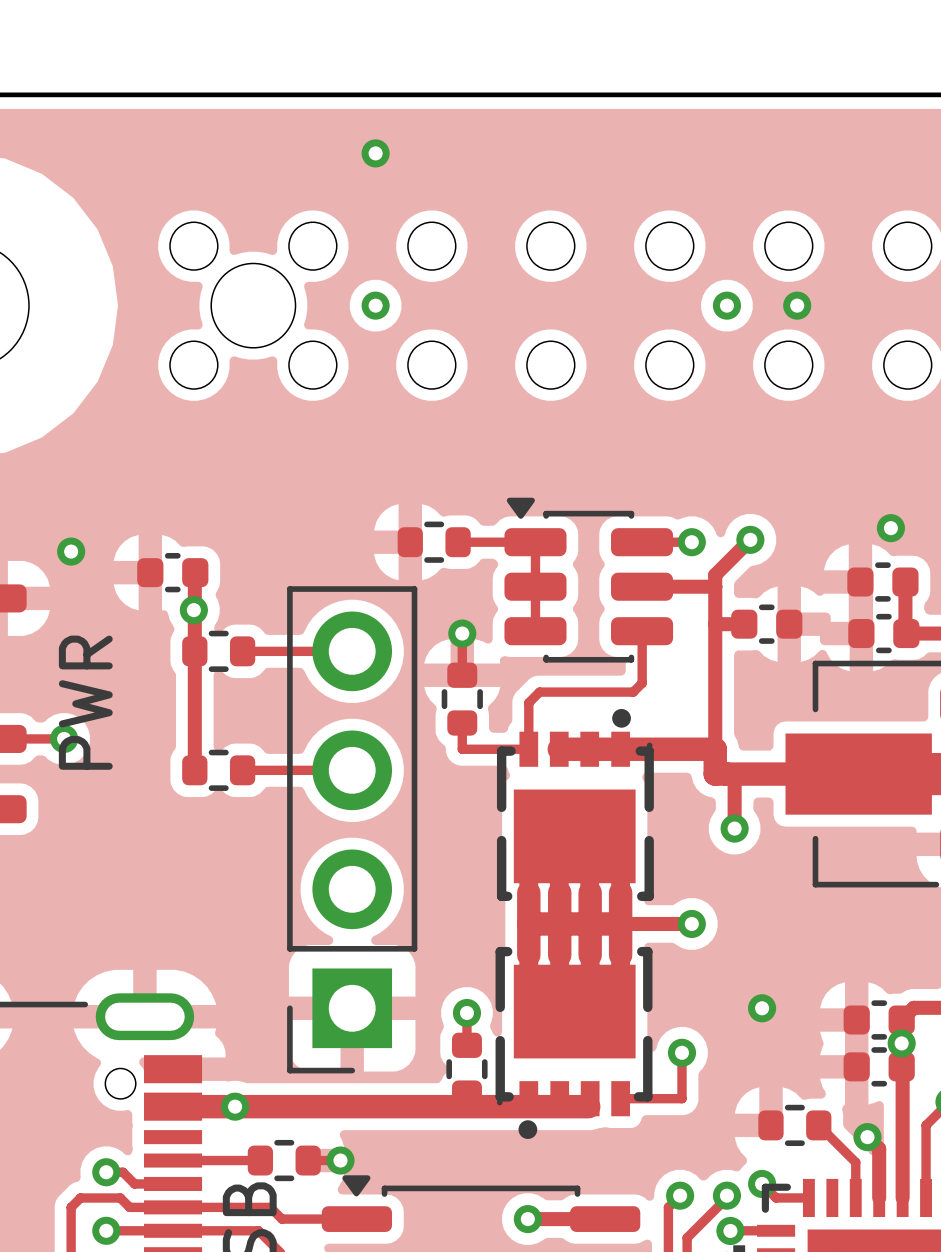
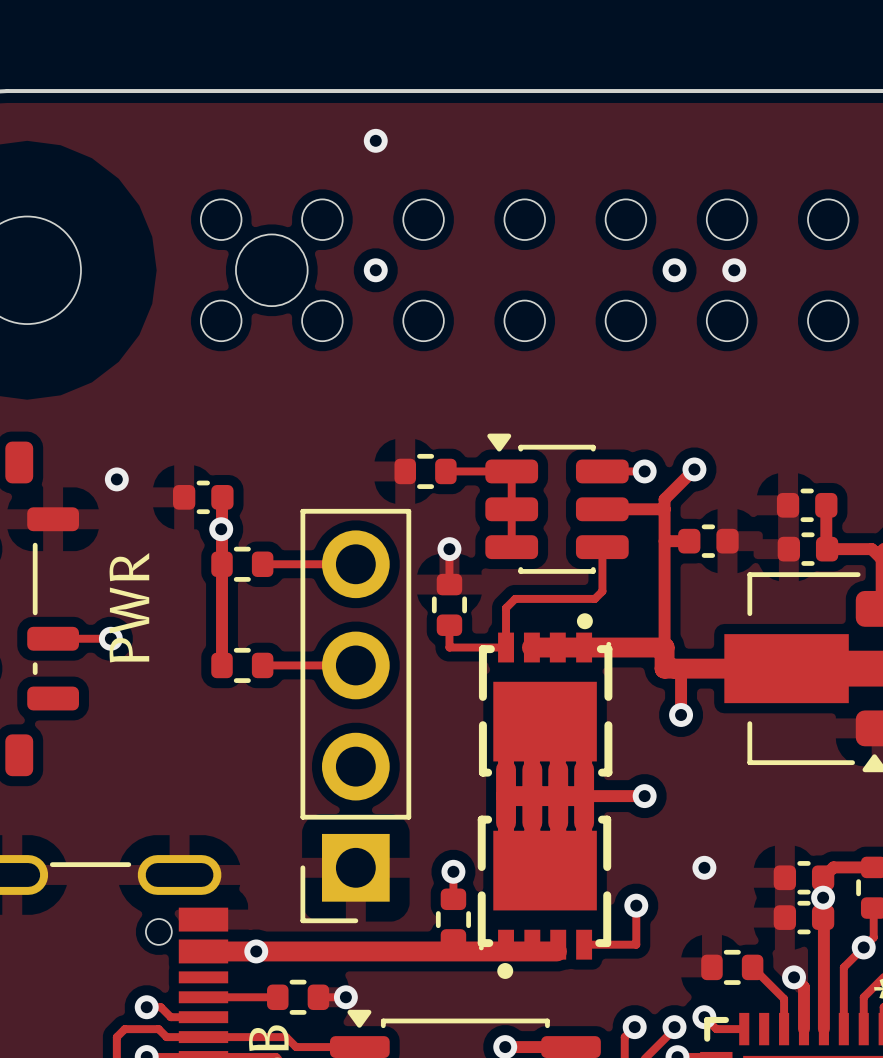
via: (890, 528) -> none

